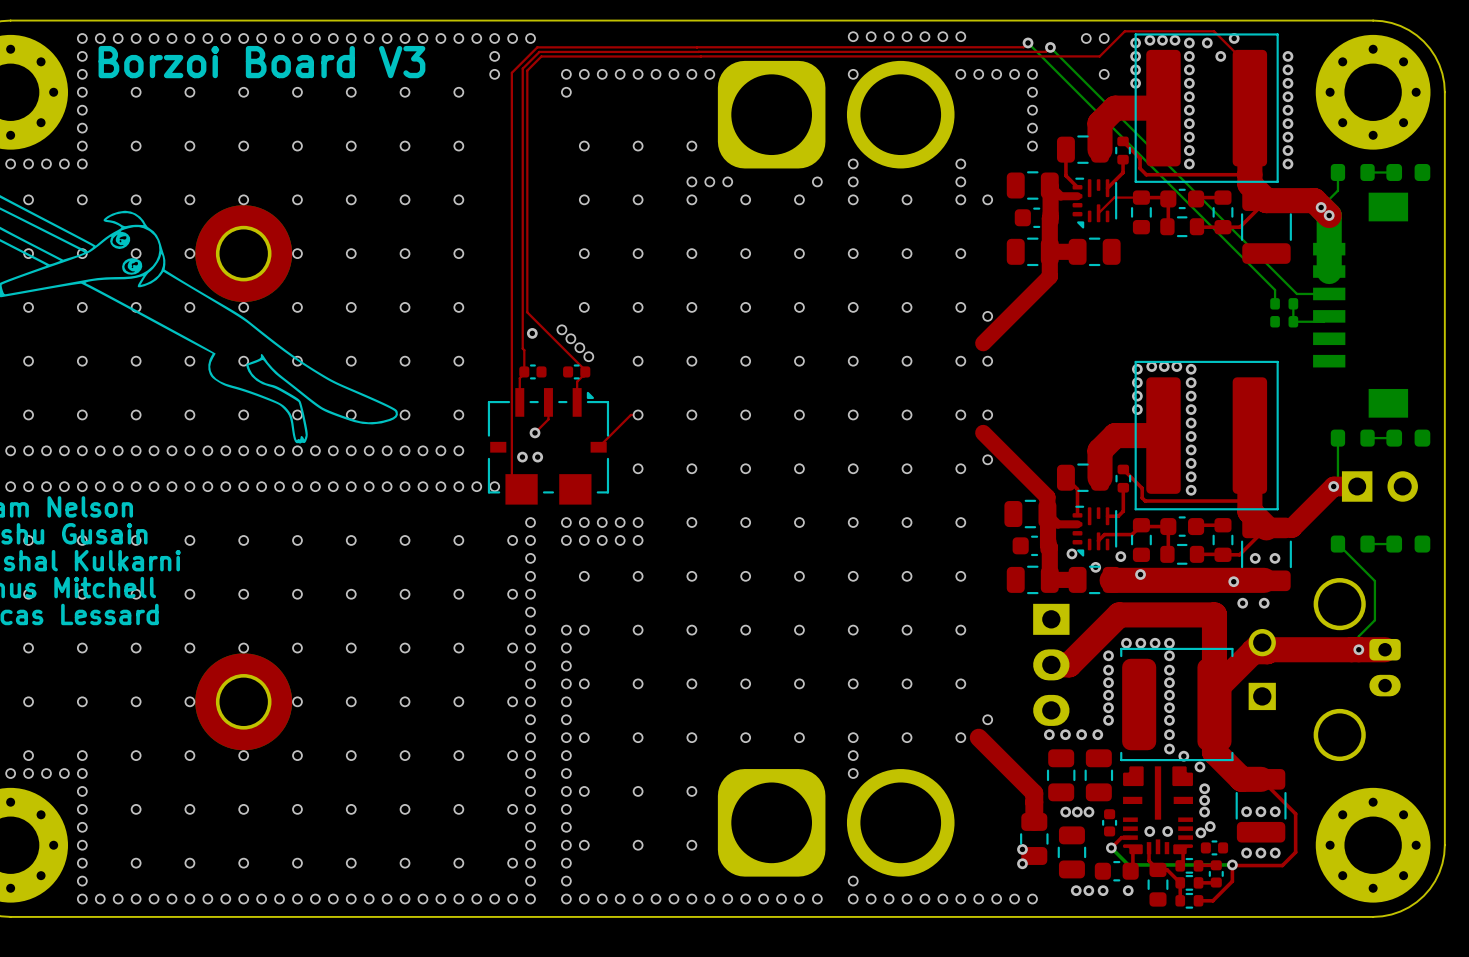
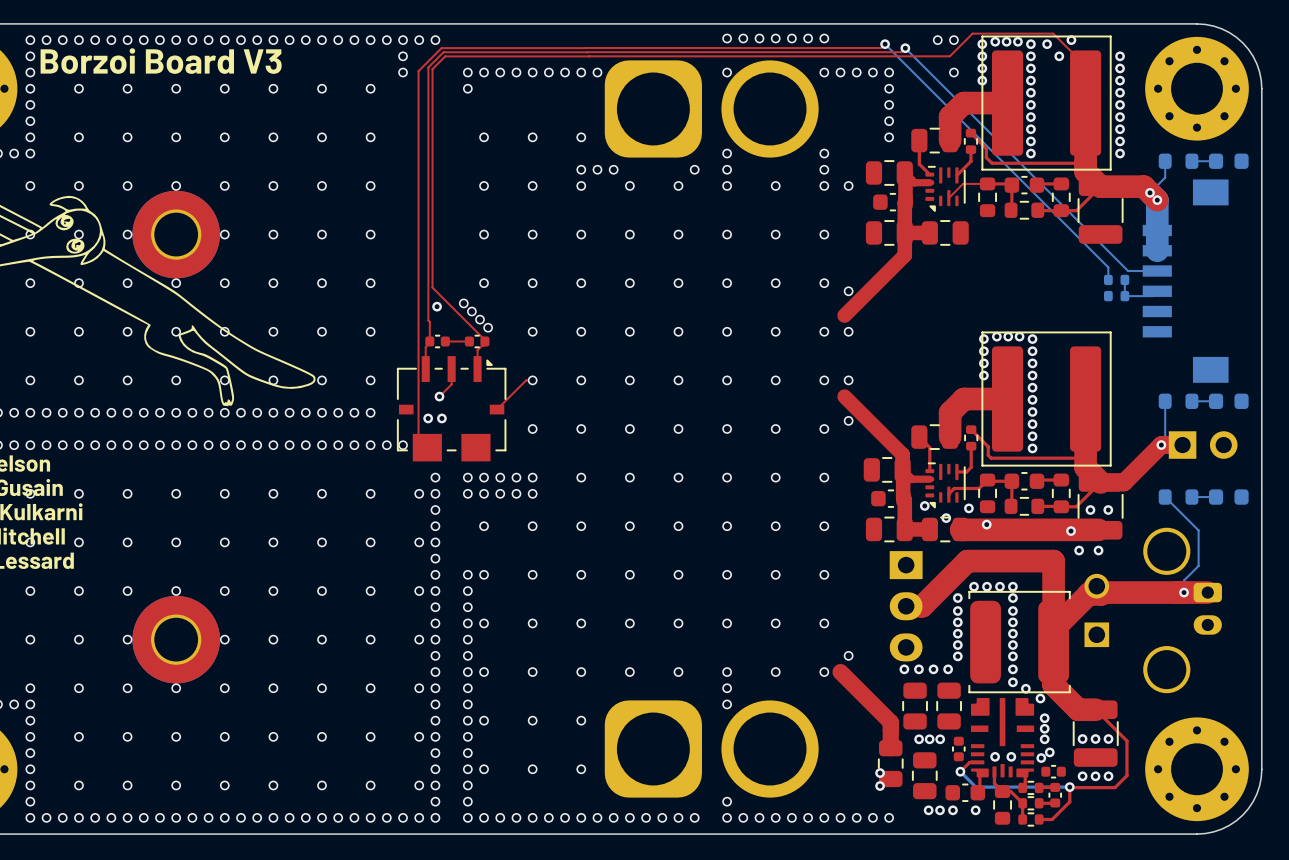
top track: none -> (442, 341) (469, 341)

